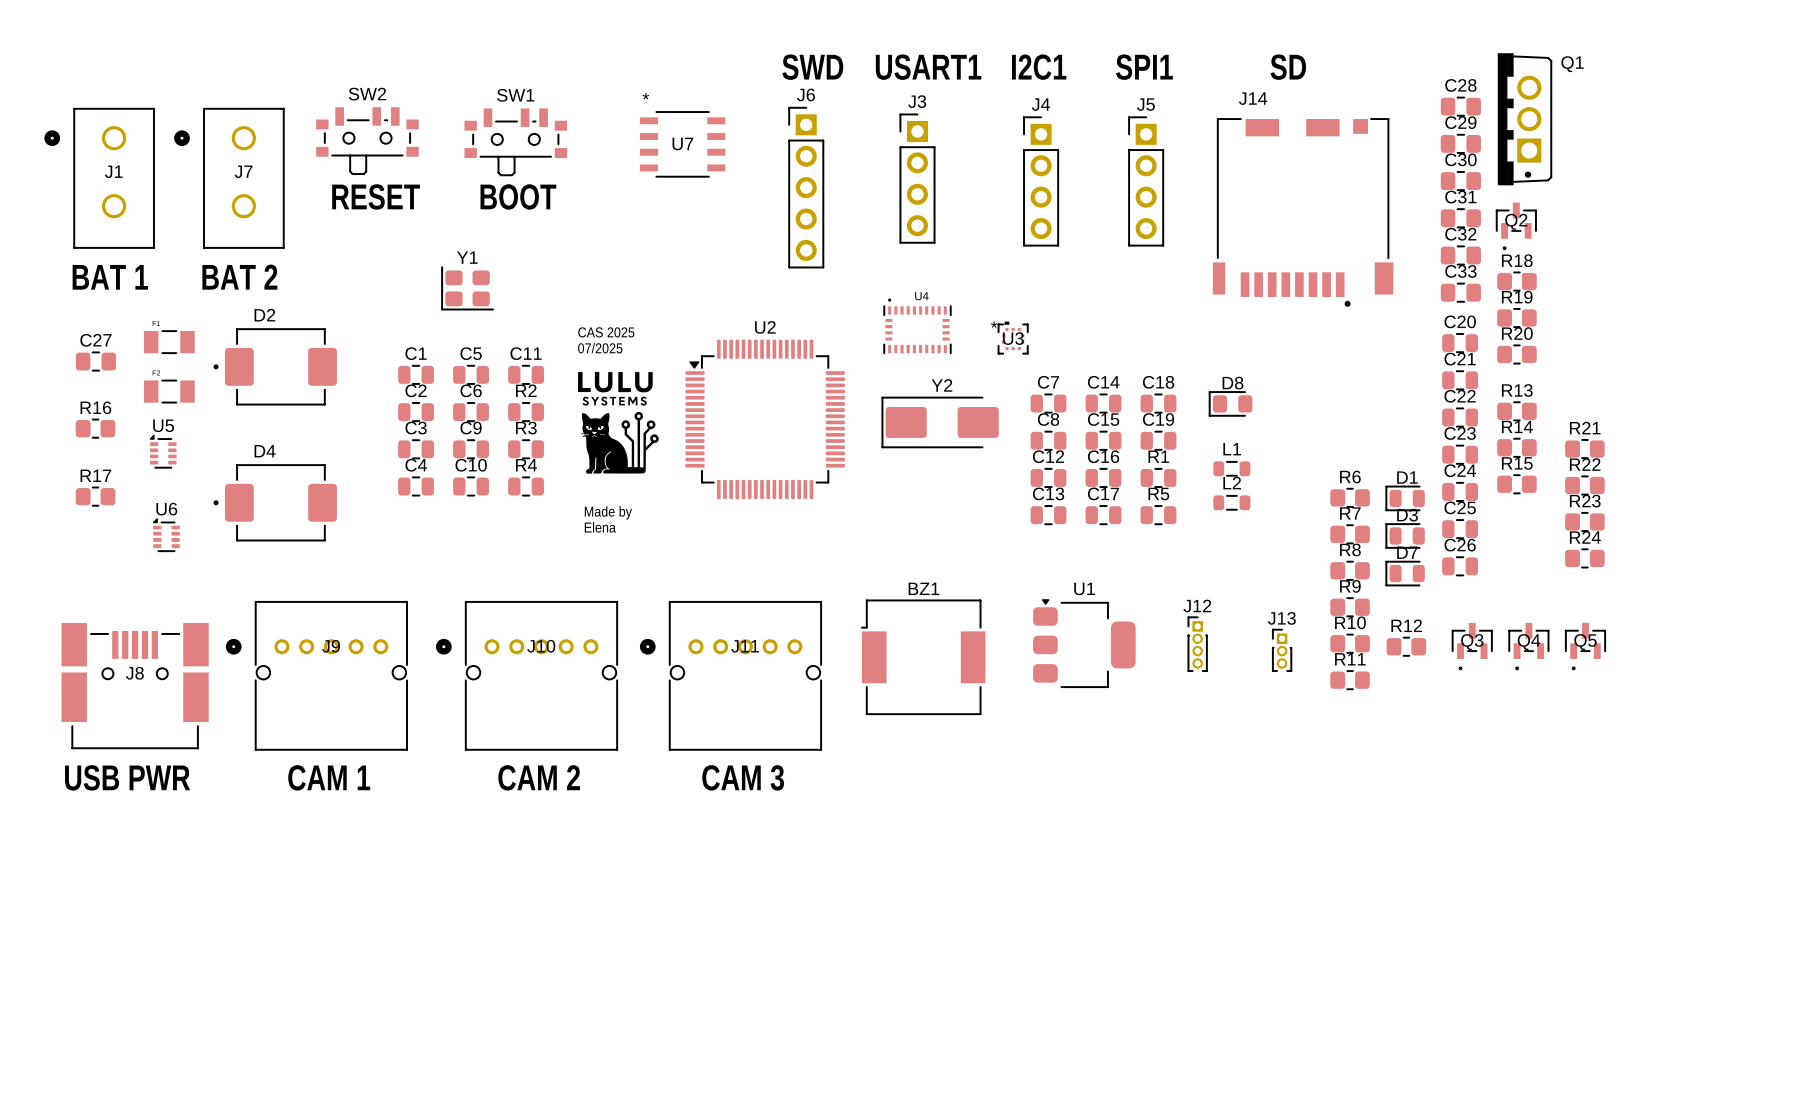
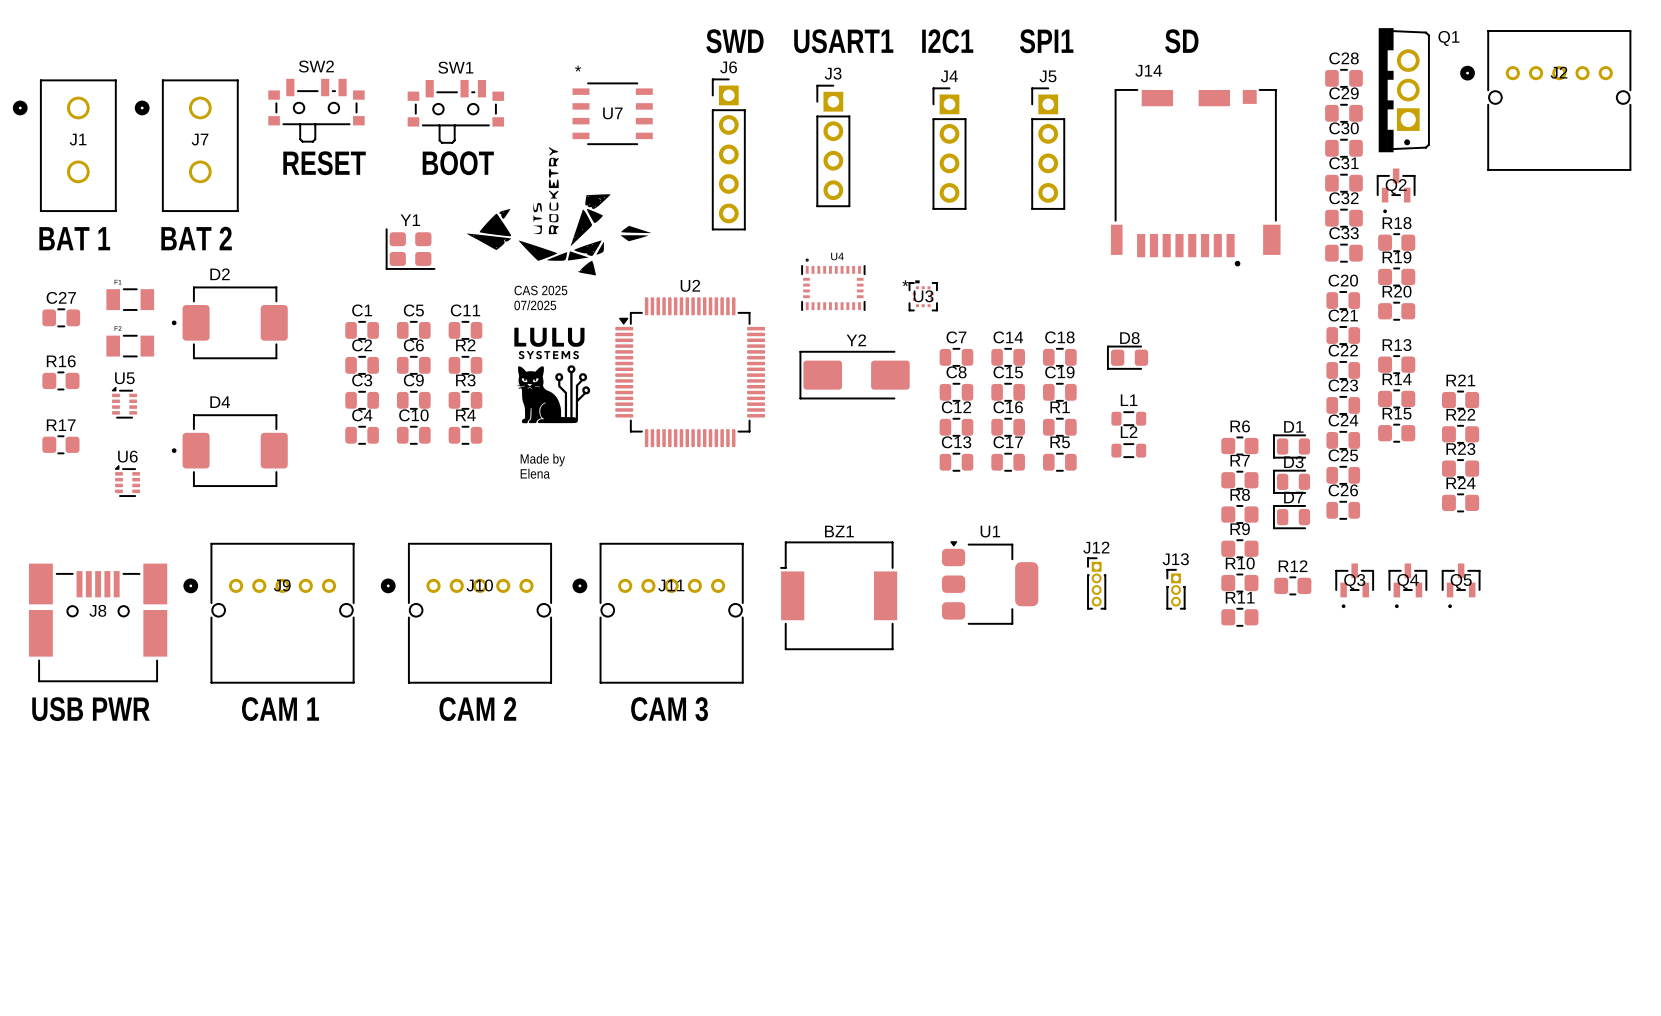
J2: none -> (1545, 100)
drawing: none -> [466, 147, 652, 276]

